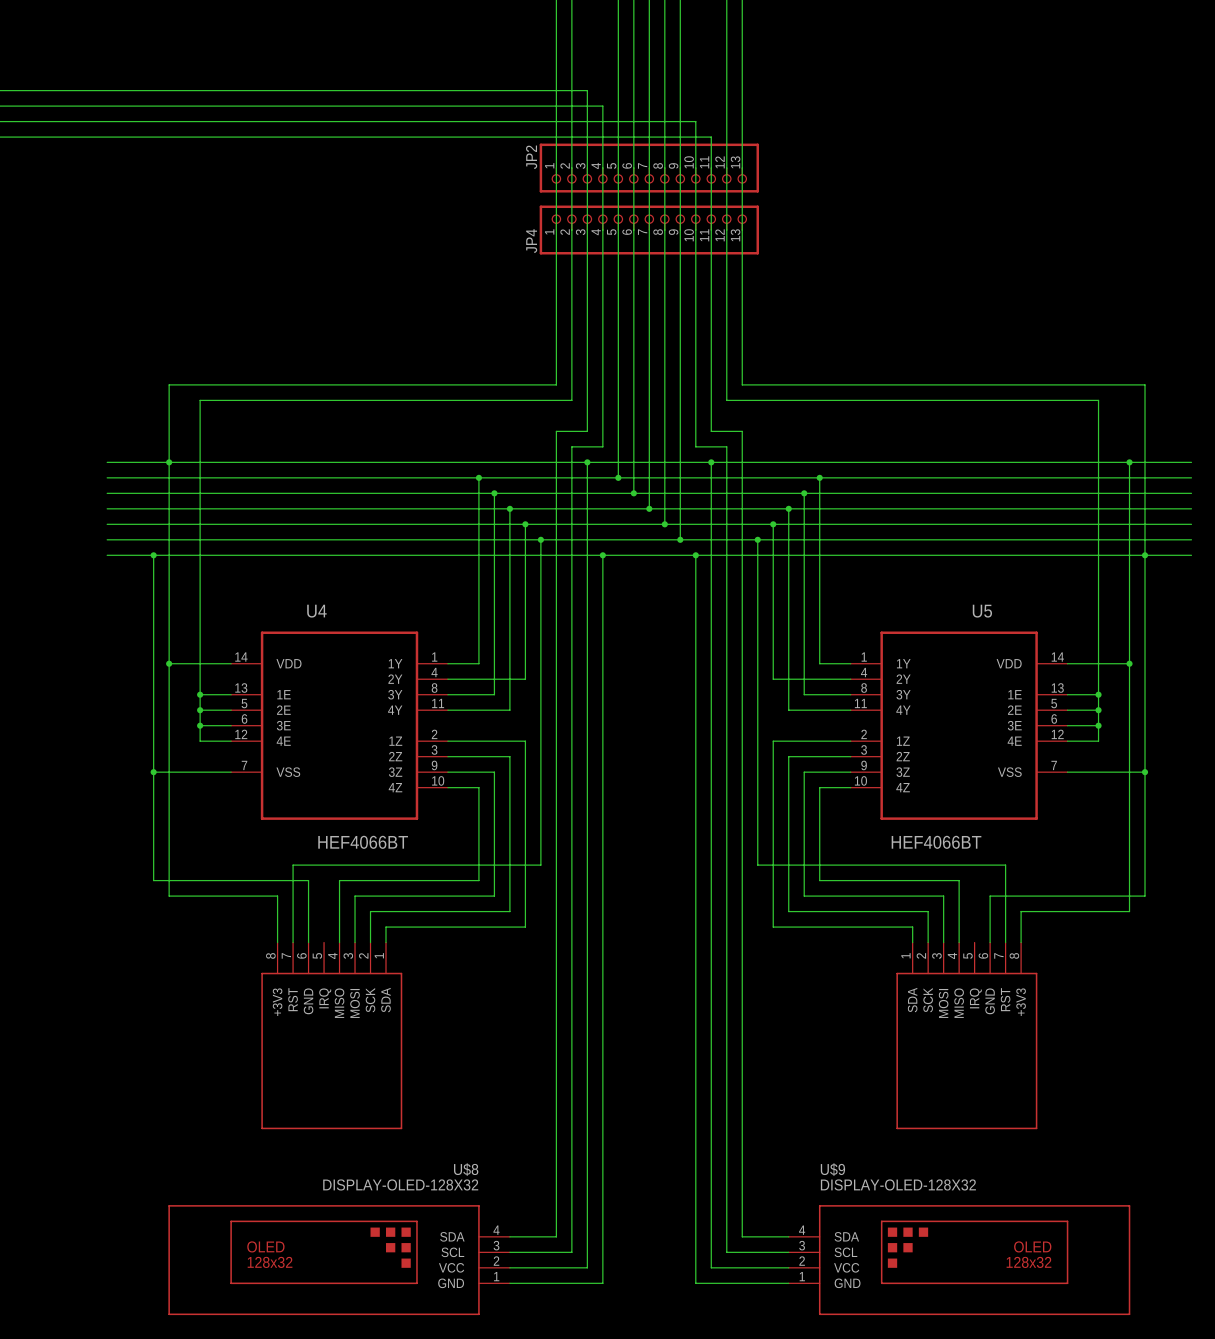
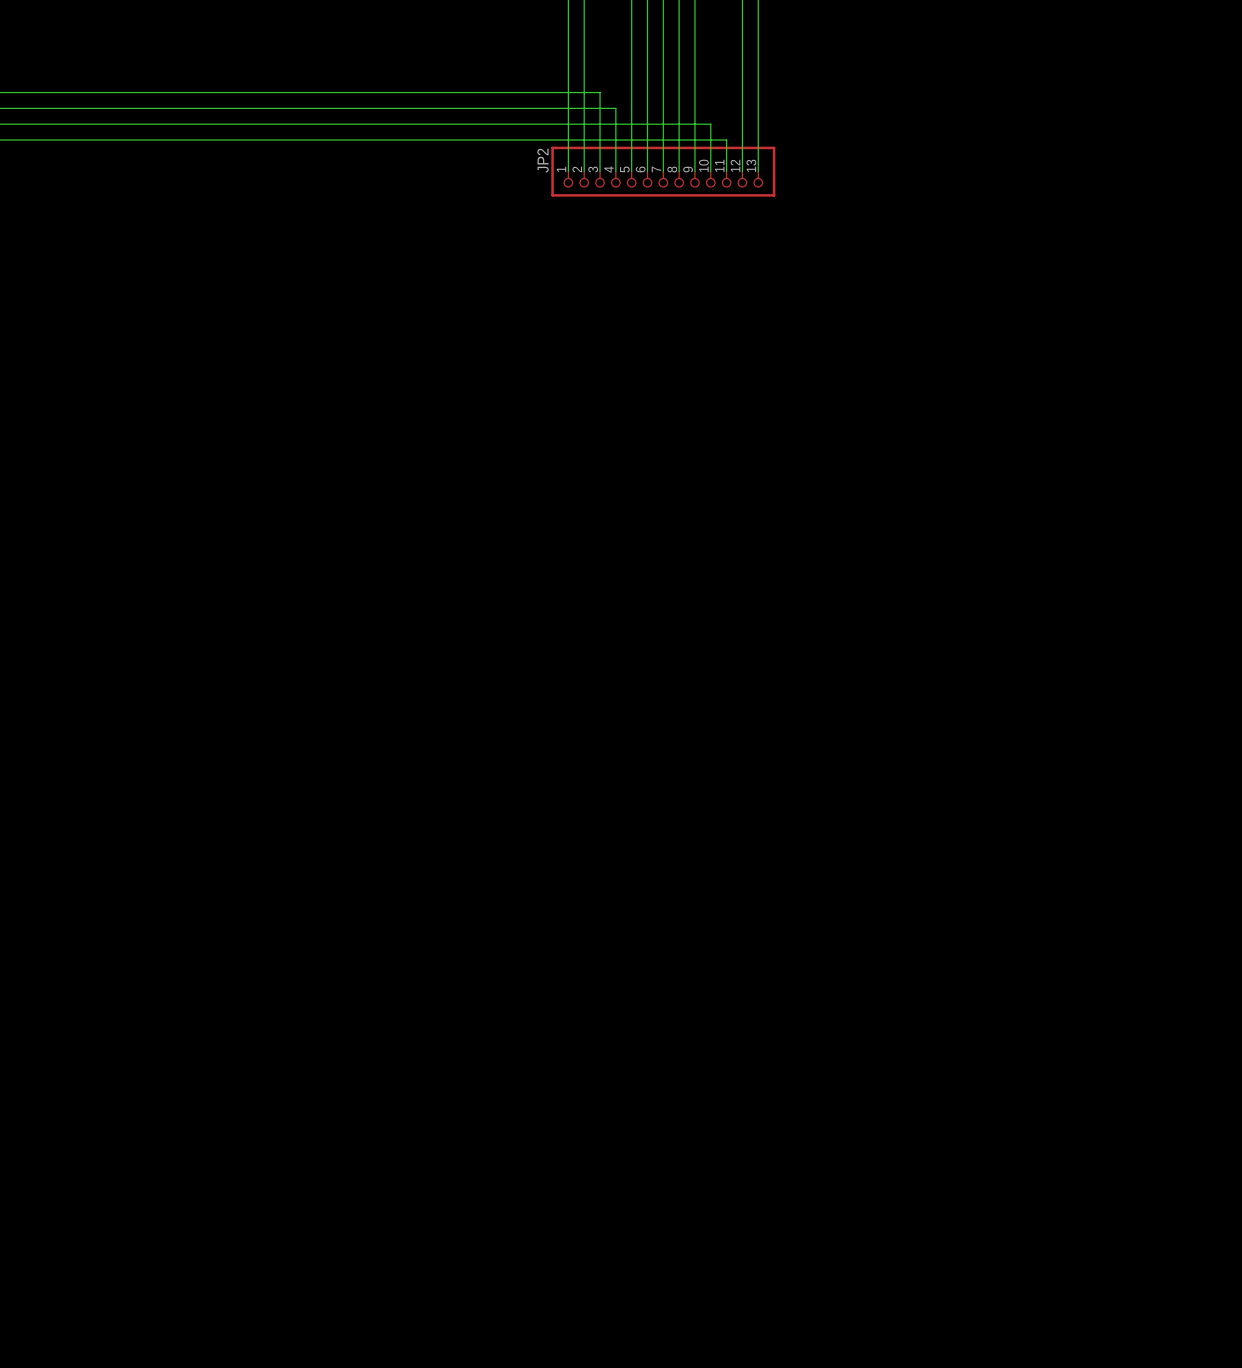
wire: (556, 168) (556, 384) (169, 384) (169, 896) (277, 896) (277, 942) -> none
wire: (571, 168) (571, 400) (200, 400) (200, 741) (231, 741) -> none
wire: (587, 168) (587, 431) (556, 431) (556, 1236) (509, 1236) -> none
wire: (602, 168) (602, 446) (571, 446) (571, 1252) (509, 1252) -> none
wire: (618, 168) (618, 477) -> none
wire: (633, 168) (633, 493) -> none
wire: (649, 168) (649, 508) -> none
wire: (664, 168) (664, 524) -> none
wire: (680, 168) (680, 539) -> none
wire: (695, 168) (695, 446) (726, 446) (726, 1252) (788, 1252) -> none
wire: (711, 168) (711, 431) (742, 431) (742, 1236) (788, 1236) -> none
wire: (726, 168) (726, 400) (1098, 400) (1098, 741) (1067, 741) -> none
wire: (742, 168) (742, 384) (1145, 384) (1145, 896) (990, 896) (990, 942) -> none
JP4: (649, 230) -> none
wire: (107, 462) (1191, 462) -> none
junction: (169, 462) -> none
wire: (587, 462) (587, 1267) (509, 1267) -> none
junction: (587, 462) -> none
wire: (711, 462) (711, 1267) (788, 1267) -> none
junction: (711, 462) -> none
wire: (1129, 462) (1129, 911) (1021, 911) (1021, 942) -> none
junction: (1129, 462) -> none
wire: (107, 477) (1191, 477) -> none
wire: (478, 477) (478, 663) (447, 663) -> none
junction: (478, 477) -> none
junction: (618, 477) -> none
wire: (819, 477) (819, 663) (850, 663) -> none
junction: (819, 477) -> none
wire: (107, 493) (1191, 493) -> none
wire: (494, 493) (494, 694) (447, 694) -> none
junction: (494, 493) -> none
junction: (633, 493) -> none
wire: (804, 493) (804, 694) (850, 694) -> none
junction: (804, 493) -> none
wire: (107, 508) (1191, 508) -> none
wire: (509, 508) (509, 710) (447, 710) -> none
junction: (509, 508) -> none
junction: (649, 508) -> none
wire: (788, 508) (788, 710) (850, 710) -> none
junction: (788, 508) -> none
wire: (107, 524) (1191, 524) -> none
wire: (525, 524) (525, 679) (447, 679) -> none
junction: (525, 524) -> none
junction: (664, 524) -> none
wire: (773, 524) (773, 679) (850, 679) -> none
junction: (773, 524) -> none
wire: (107, 539) (1191, 539) -> none
wire: (540, 539) (540, 865) (293, 865) (293, 942) -> none
junction: (540, 539) -> none
junction: (680, 539) -> none
wire: (757, 539) (757, 865) (1005, 865) (1005, 942) -> none
junction: (757, 539) -> none
wire: (107, 555) (1191, 555) -> none
wire: (153, 555) (153, 880) (308, 880) (308, 942) -> none
junction: (153, 555) -> none
wire: (602, 555) (602, 1283) (509, 1283) -> none
junction: (602, 555) -> none
wire: (695, 555) (695, 1283) (788, 1283) -> none
junction: (695, 555) -> none
junction: (1145, 555) -> none
wire: (169, 663) (231, 663) -> none
junction: (169, 663) -> none
wire: (1067, 663) (1129, 663) -> none
junction: (1129, 663) -> none
wire: (200, 694) (231, 694) -> none
junction: (200, 694) -> none
wire: (1067, 694) (1098, 694) -> none
junction: (1098, 694) -> none
wire: (200, 710) (231, 710) -> none
junction: (200, 710) -> none
wire: (1067, 710) (1098, 710) -> none
junction: (1098, 710) -> none
wire: (200, 725) (231, 725) -> none
junction: (200, 725) -> none
U4: HEF4066BT (339, 725) -> none
U5: HEF4066BT (959, 725) -> none
wire: (1067, 725) (1098, 725) -> none
junction: (1098, 725) -> none
wire: (447, 741) (525, 741) (525, 927) (386, 927) (386, 942) -> none
wire: (850, 741) (773, 741) (773, 927) (912, 927) (912, 942) -> none
wire: (447, 756) (509, 756) (509, 911) (370, 911) (370, 942) -> none
wire: (850, 756) (788, 756) (788, 911) (928, 911) (928, 942) -> none
wire: (153, 772) (231, 772) -> none
junction: (153, 772) -> none
wire: (447, 772) (494, 772) (494, 896) (355, 896) (355, 942) -> none
wire: (850, 772) (804, 772) (804, 896) (943, 896) (943, 942) -> none
wire: (1067, 772) (1145, 772) -> none
junction: (1145, 772) -> none
wire: (447, 787) (478, 787) (478, 880) (339, 880) (339, 942) -> none
wire: (850, 787) (819, 787) (819, 880) (959, 880) (959, 942) -> none
part: (331, 1035) -> none
part: (966, 1035) -> none
U$8: DISPLAY-OLED-128X32 (339, 1260) -> none
U$9: DISPLAY-OLED-128X32 (959, 1260) -> none

